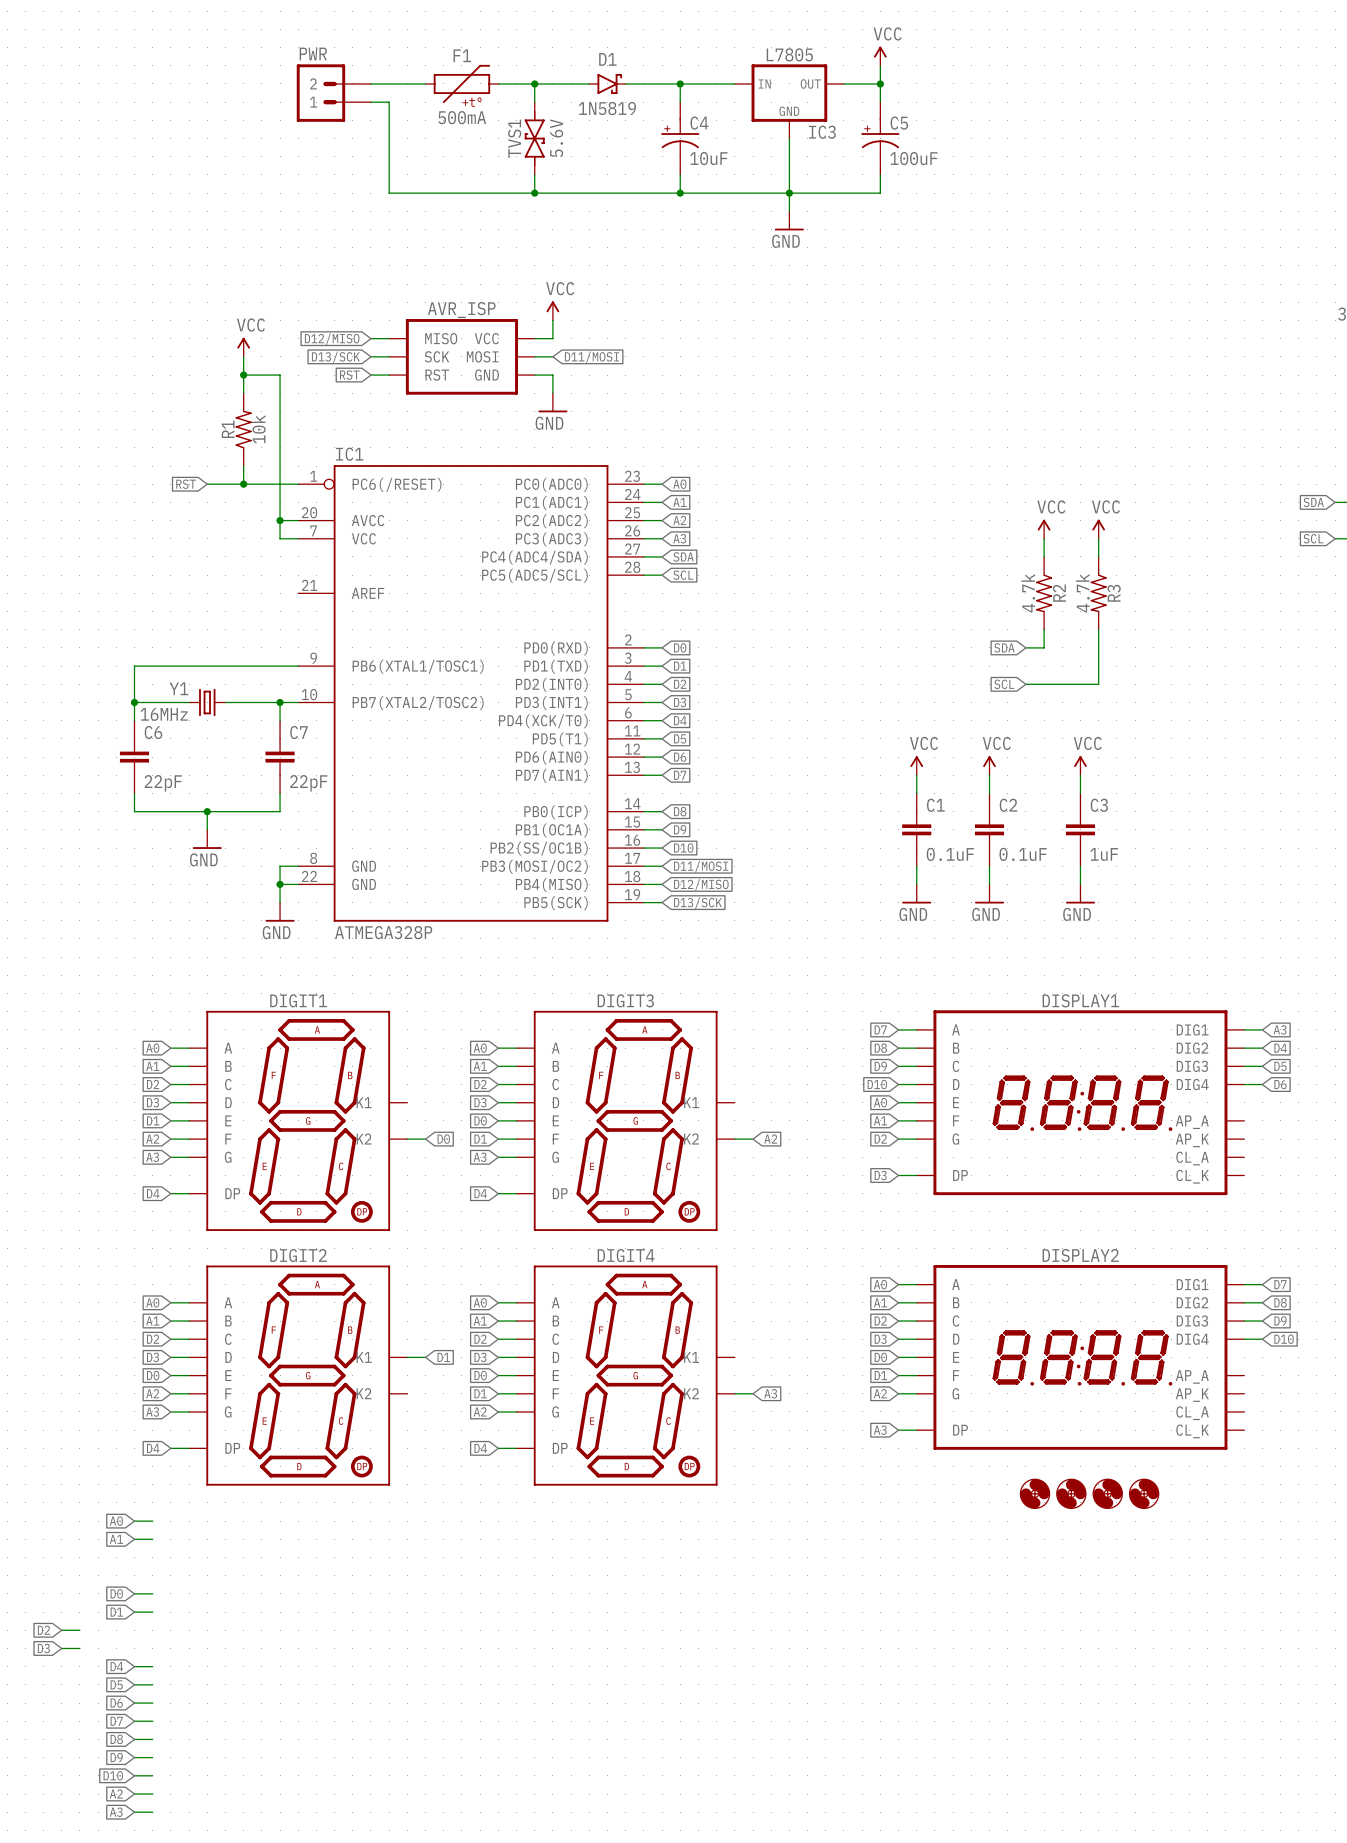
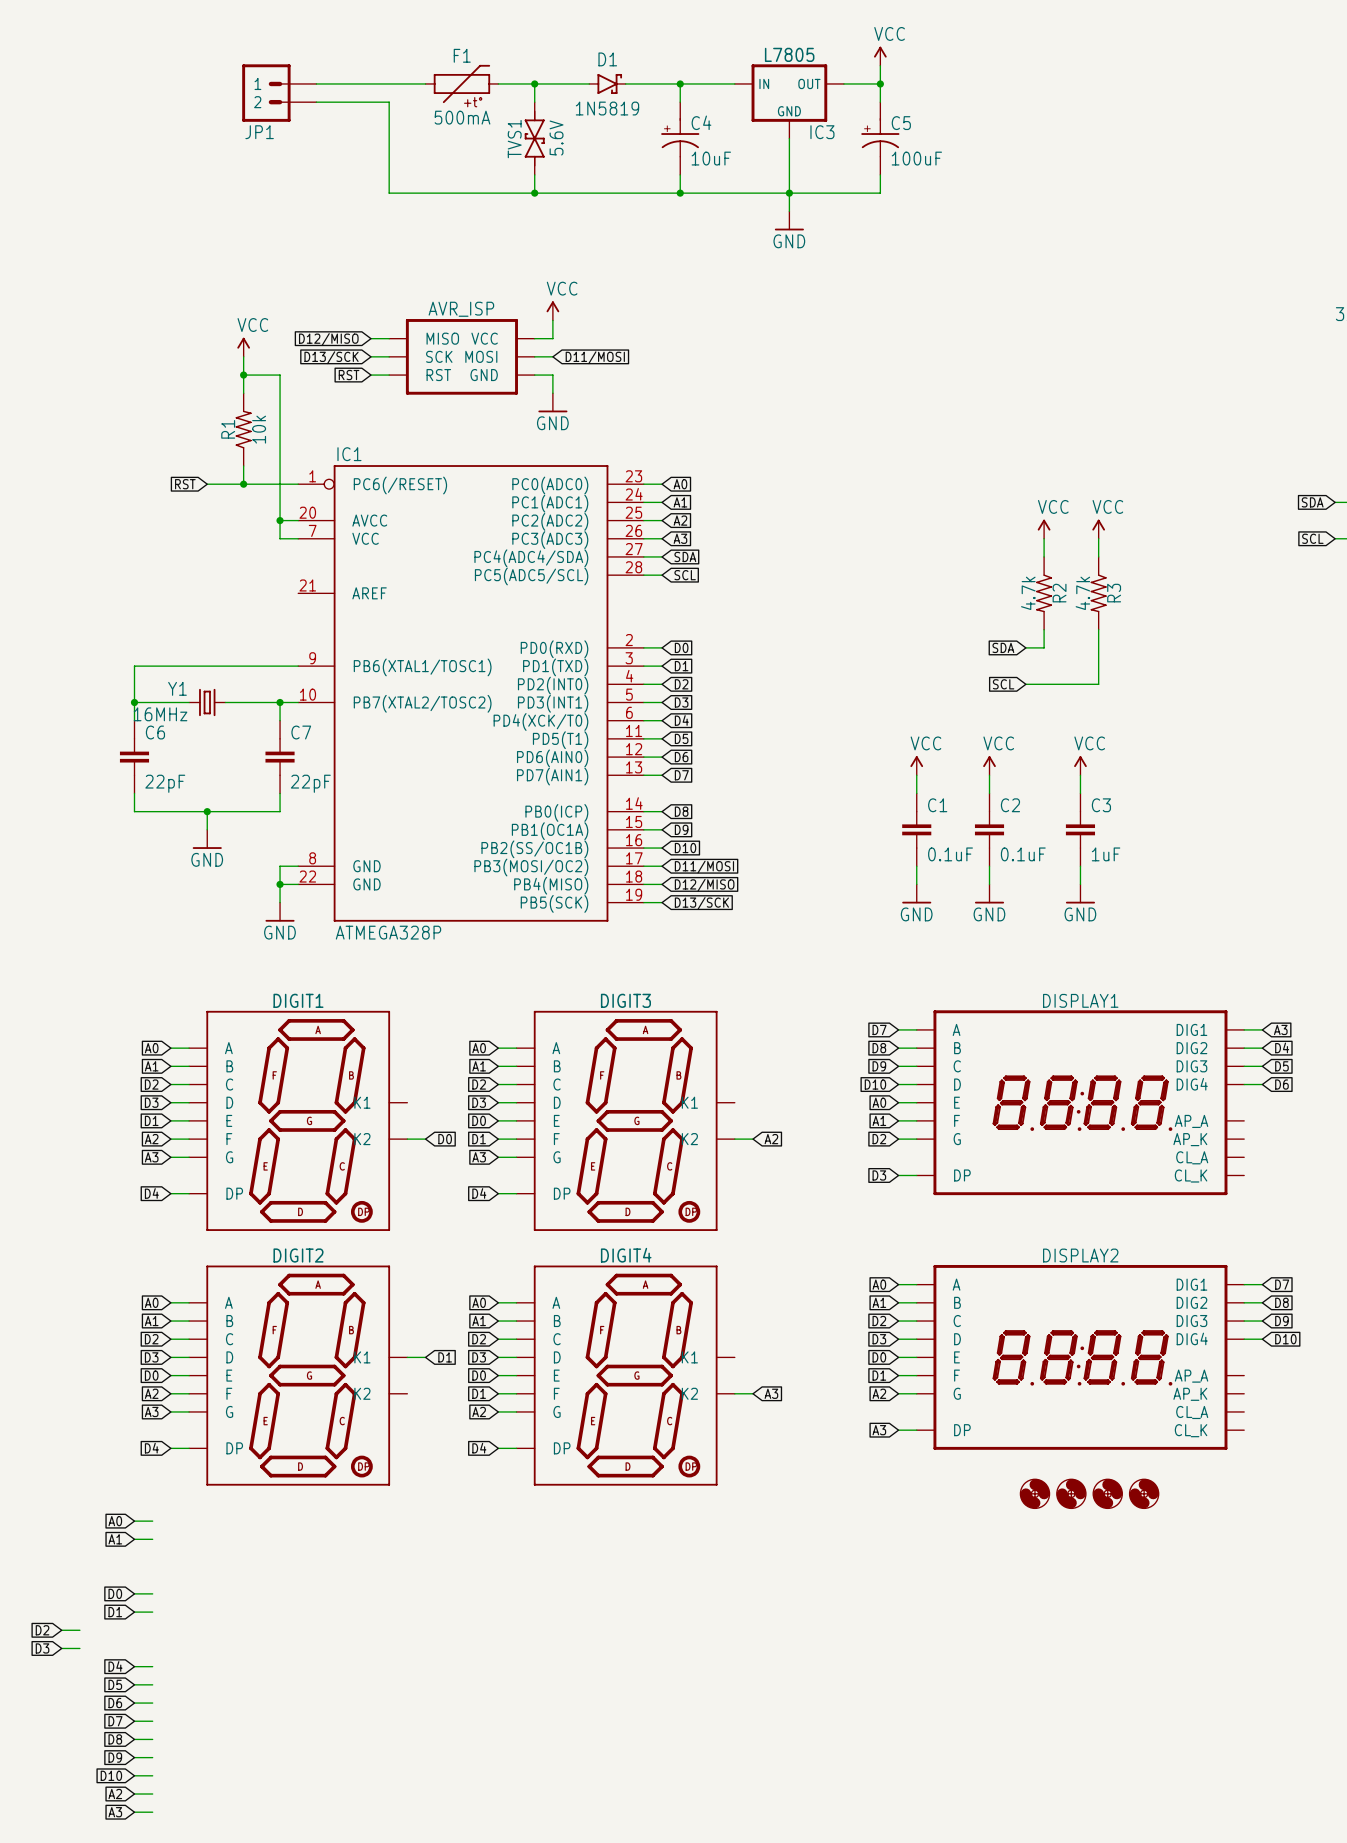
JP1: none -> (279, 93)
PWR: (333, 93) -> none

